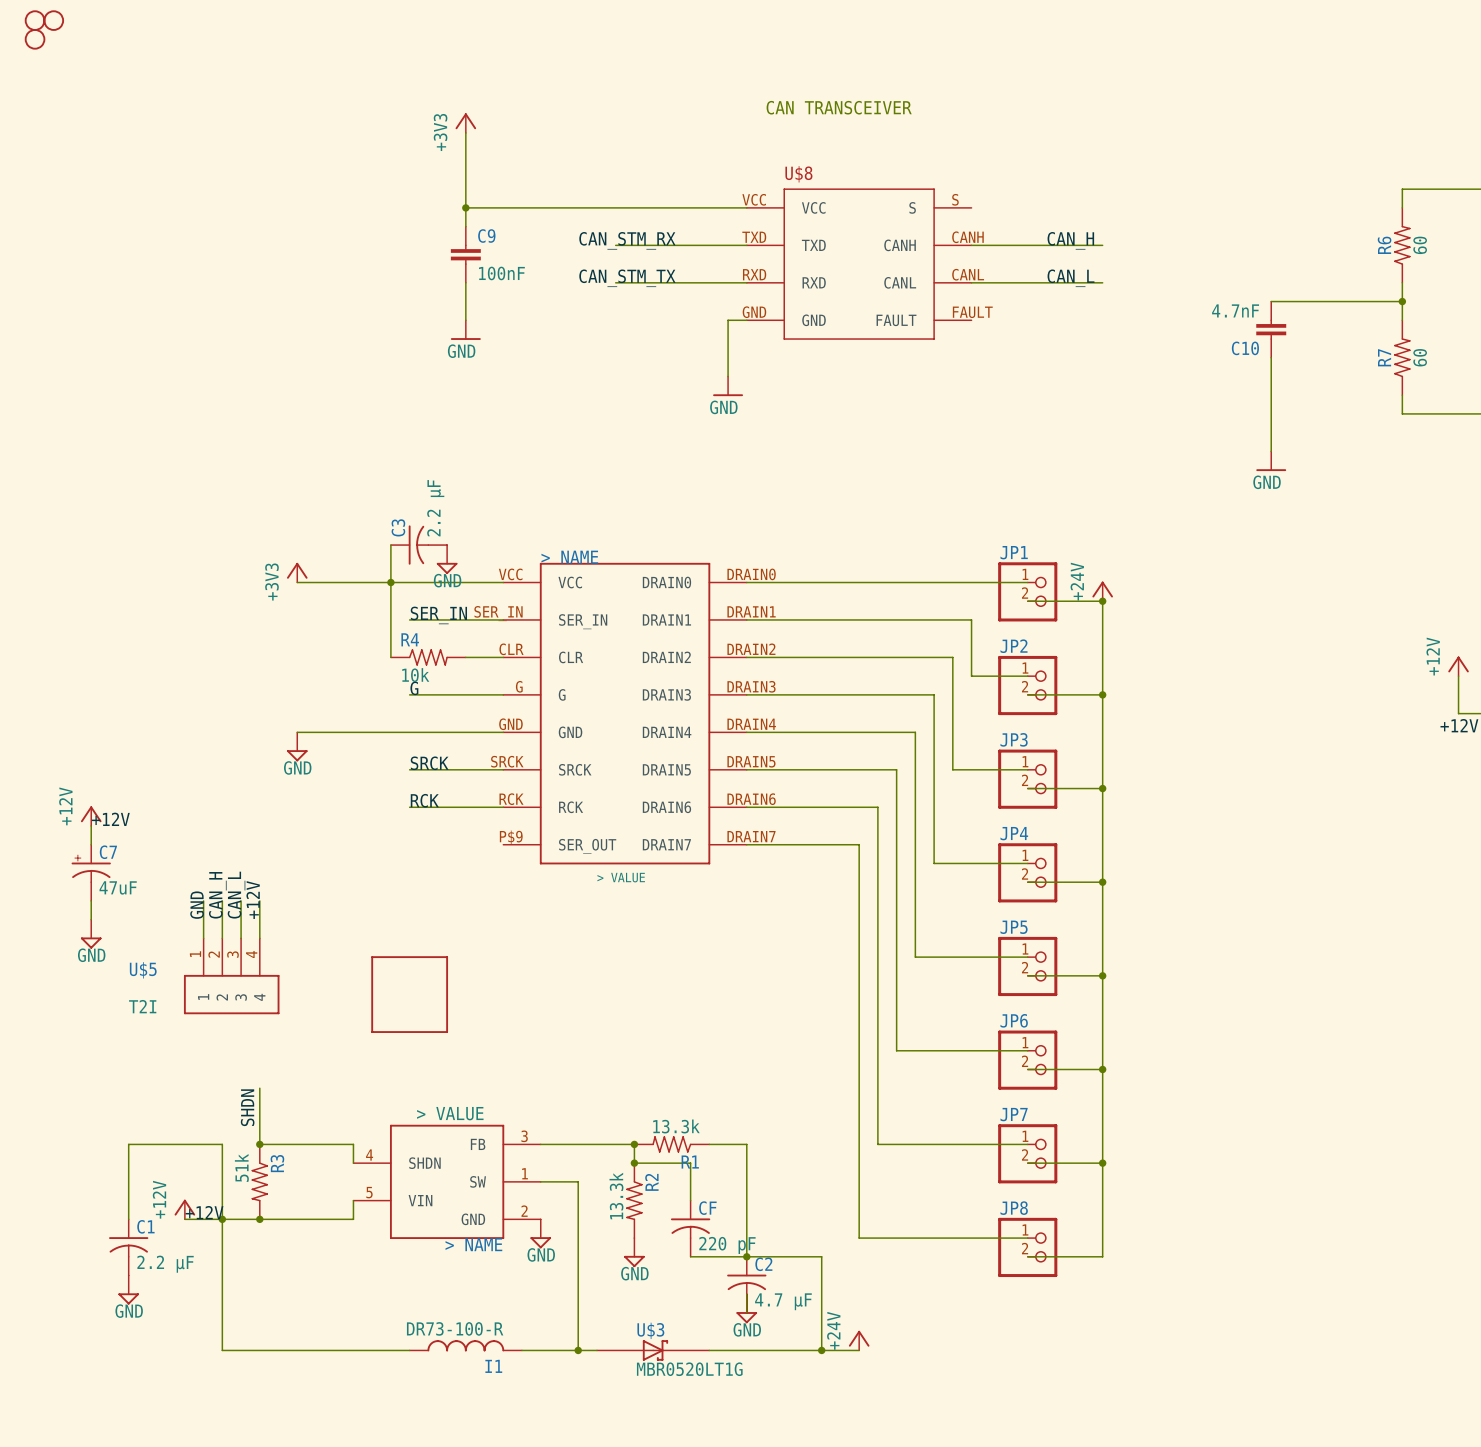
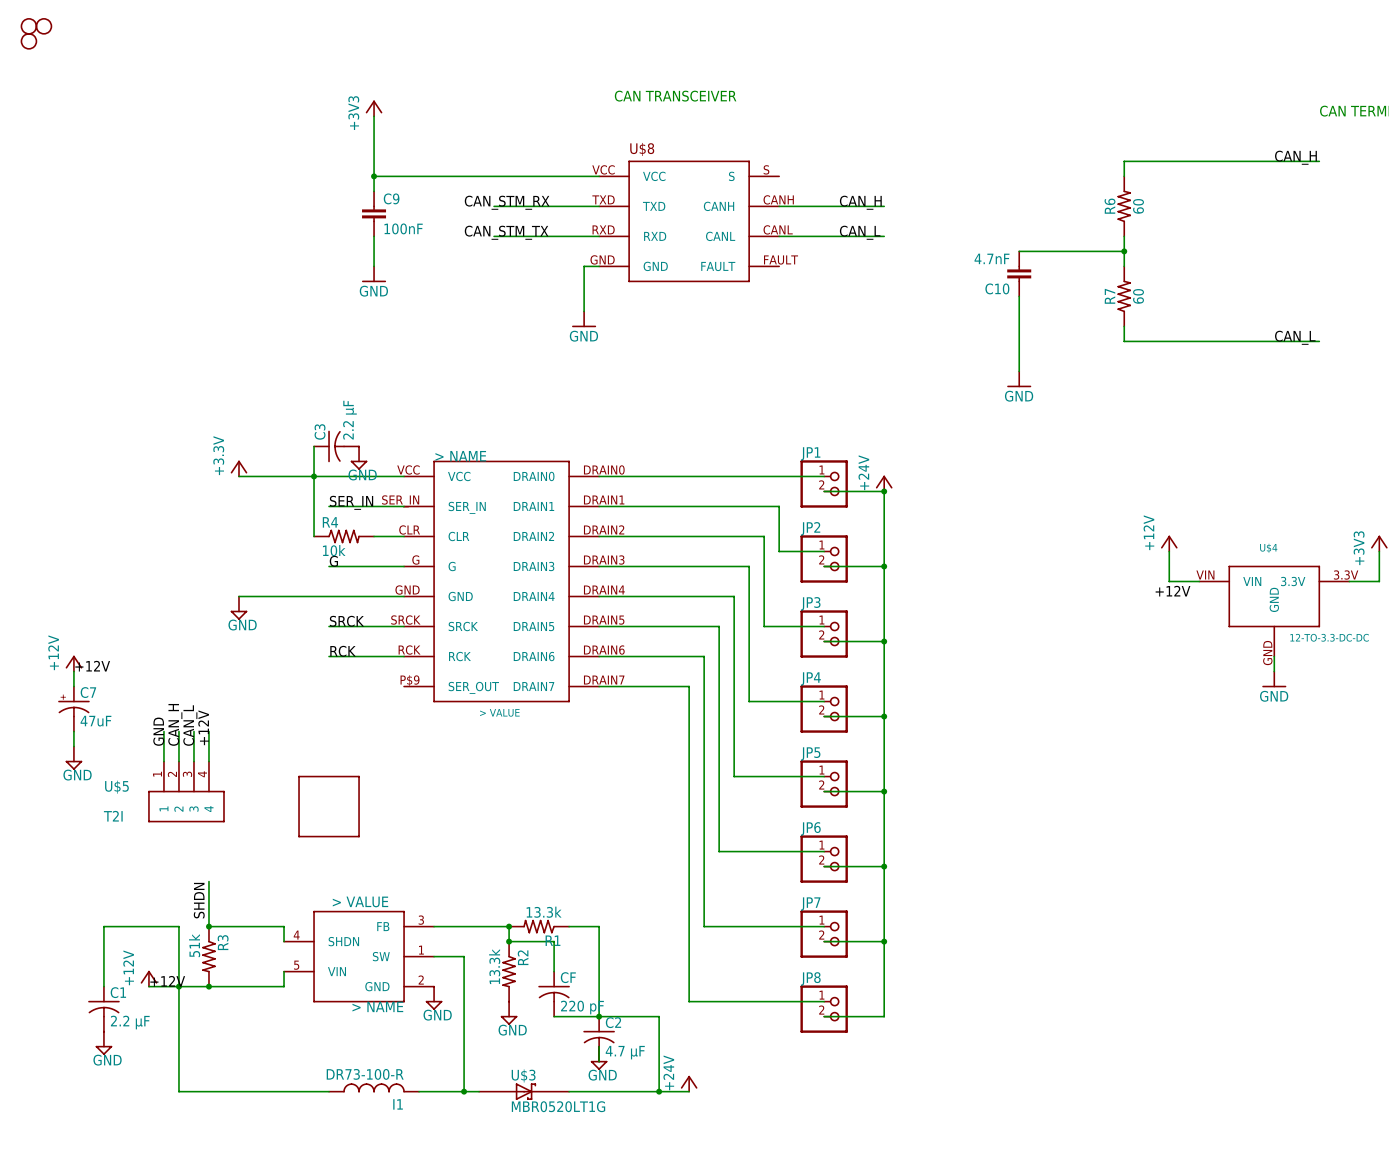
power symbol: +3V3 (297, 572) -> +3.3V (239, 468)

